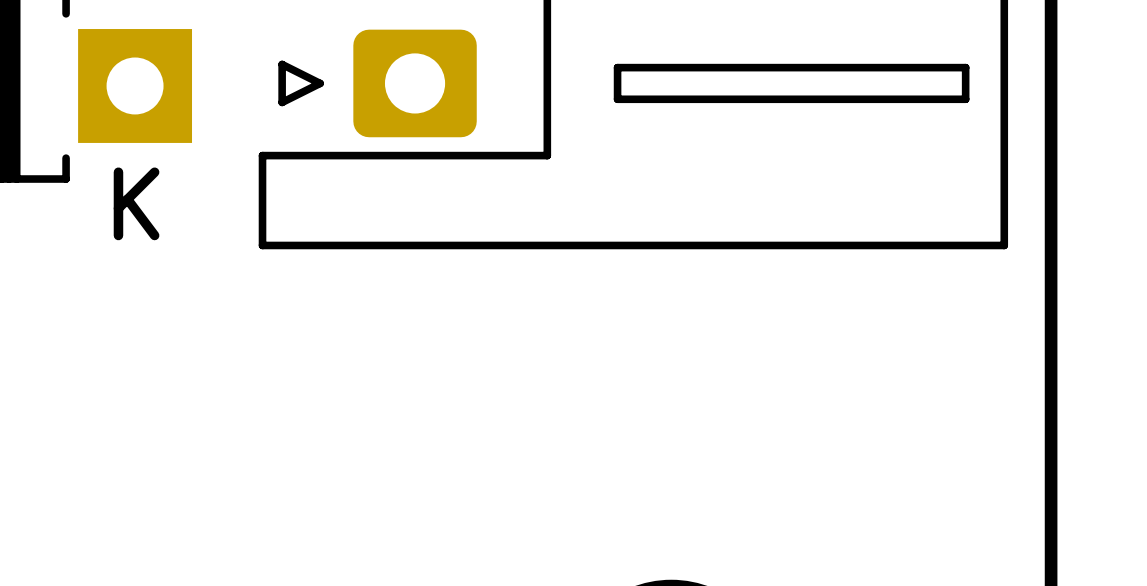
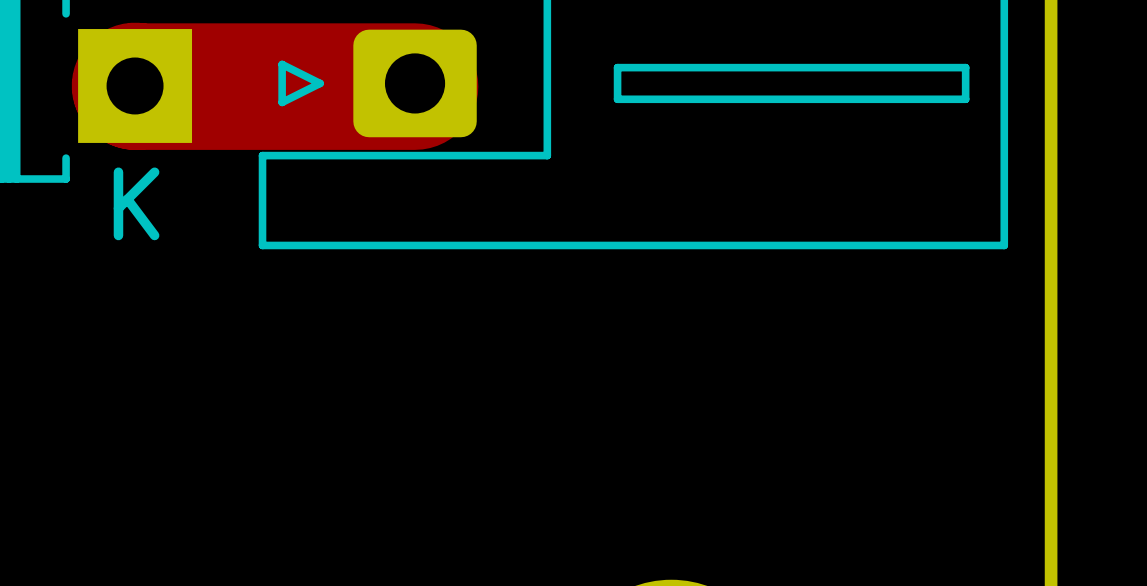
top track: none -> (135, 86) (415, 86)

